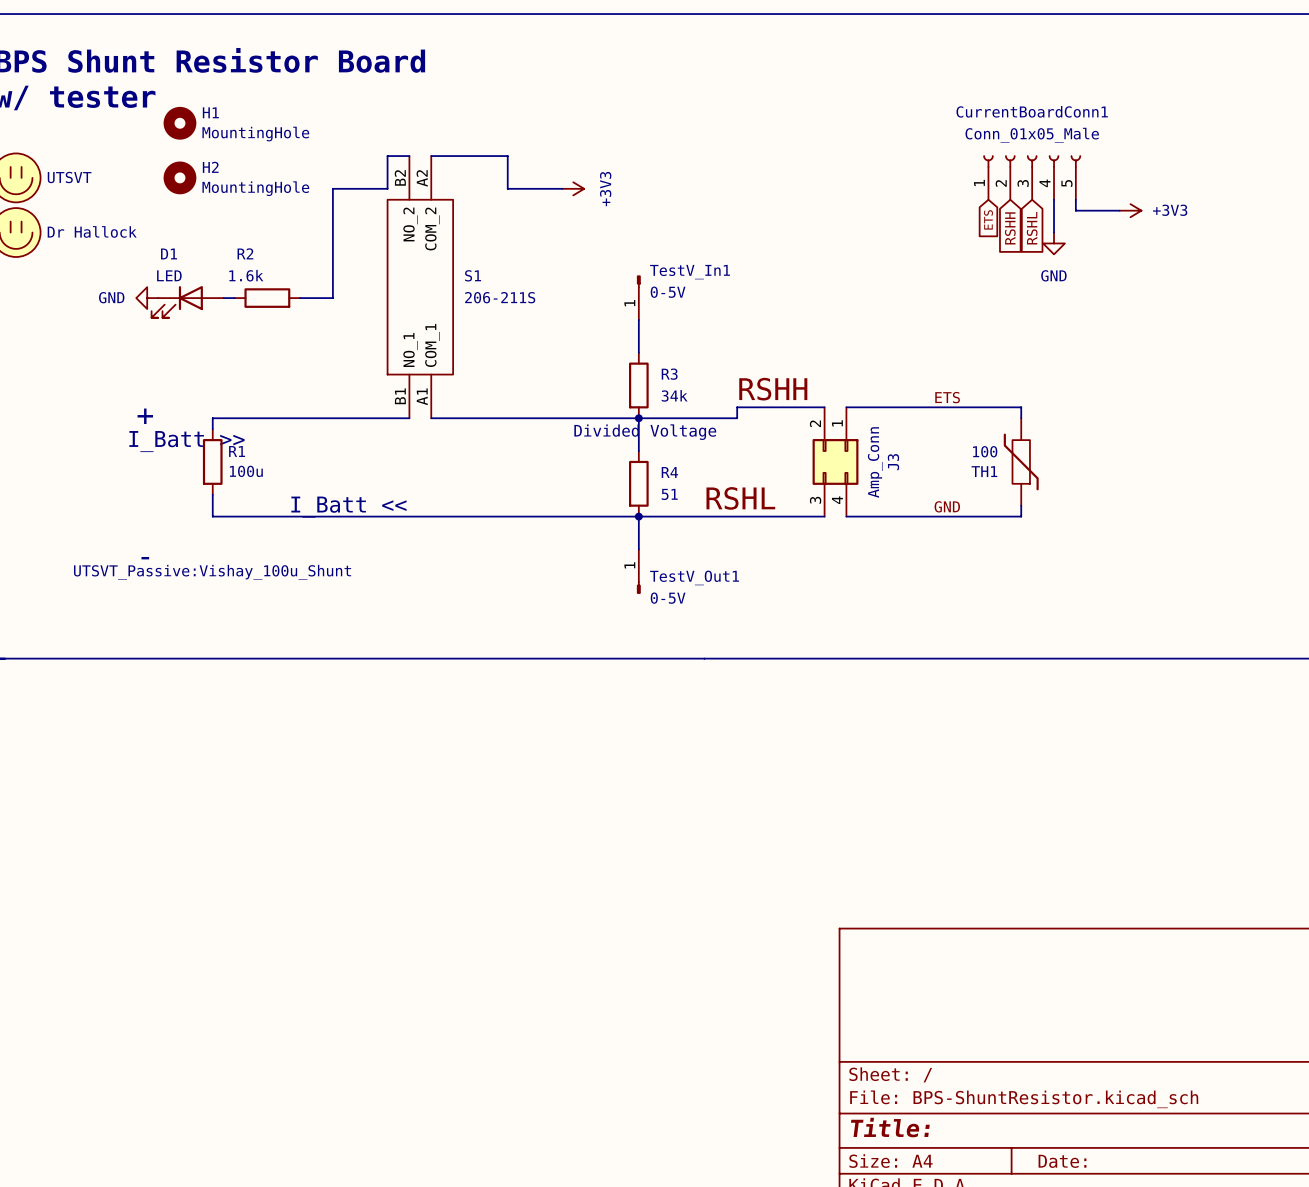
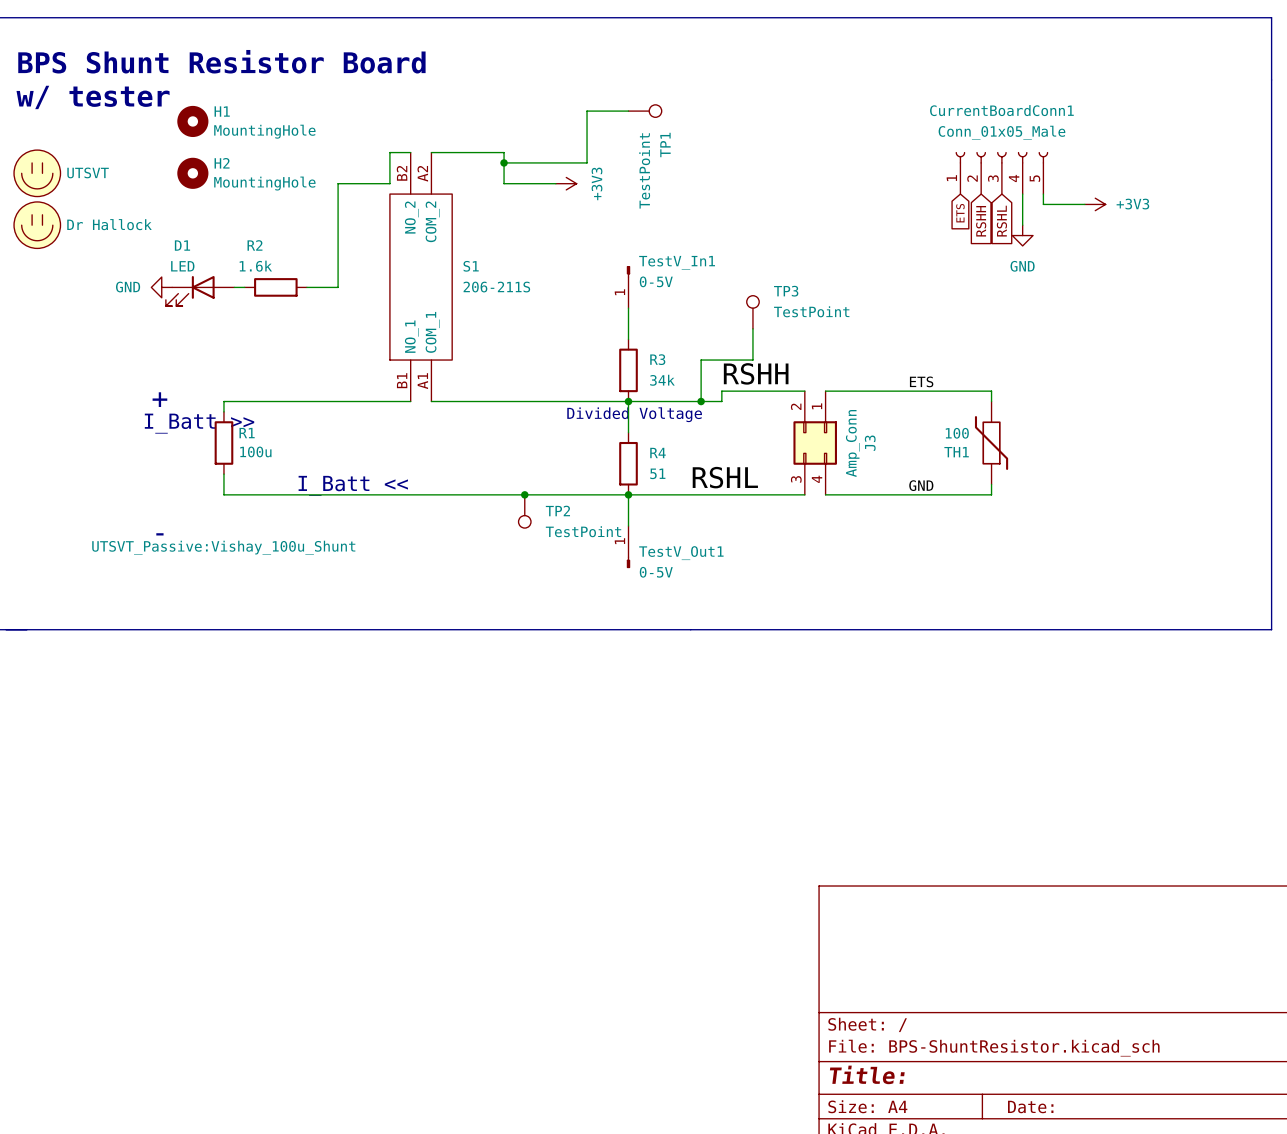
wire: none -> (628, 111) (587, 111) (587, 162) (504, 162)
TP1: none -> TestPoint (645, 111)
junction: none -> (504, 162)
TP3: none -> TestPoint (752, 312)
wire: none -> (752, 328) (752, 360) (701, 360) (701, 401)
junction: none -> (701, 401)
junction: none -> (524, 494)
TP2: none -> TestPoint (524, 511)

